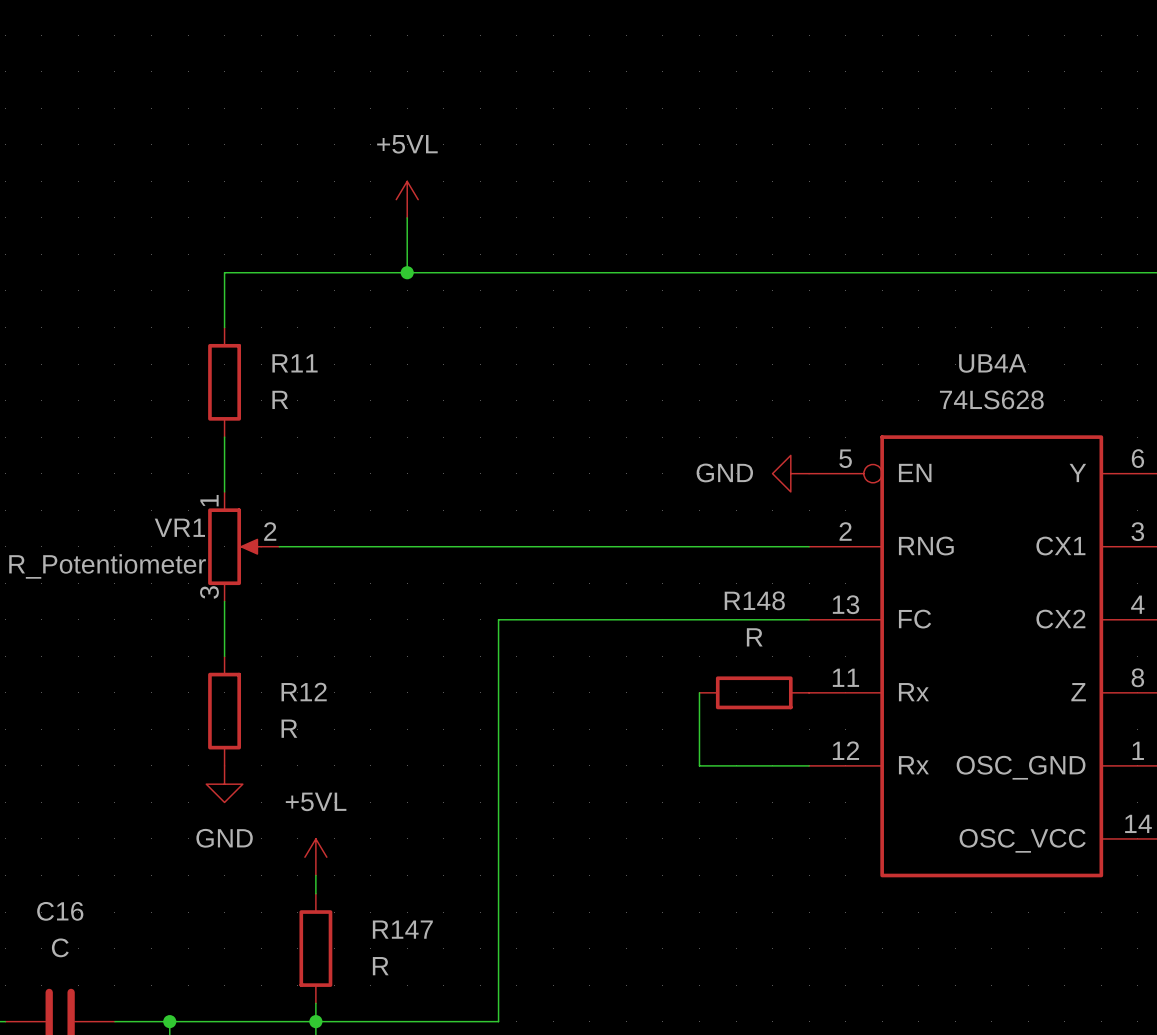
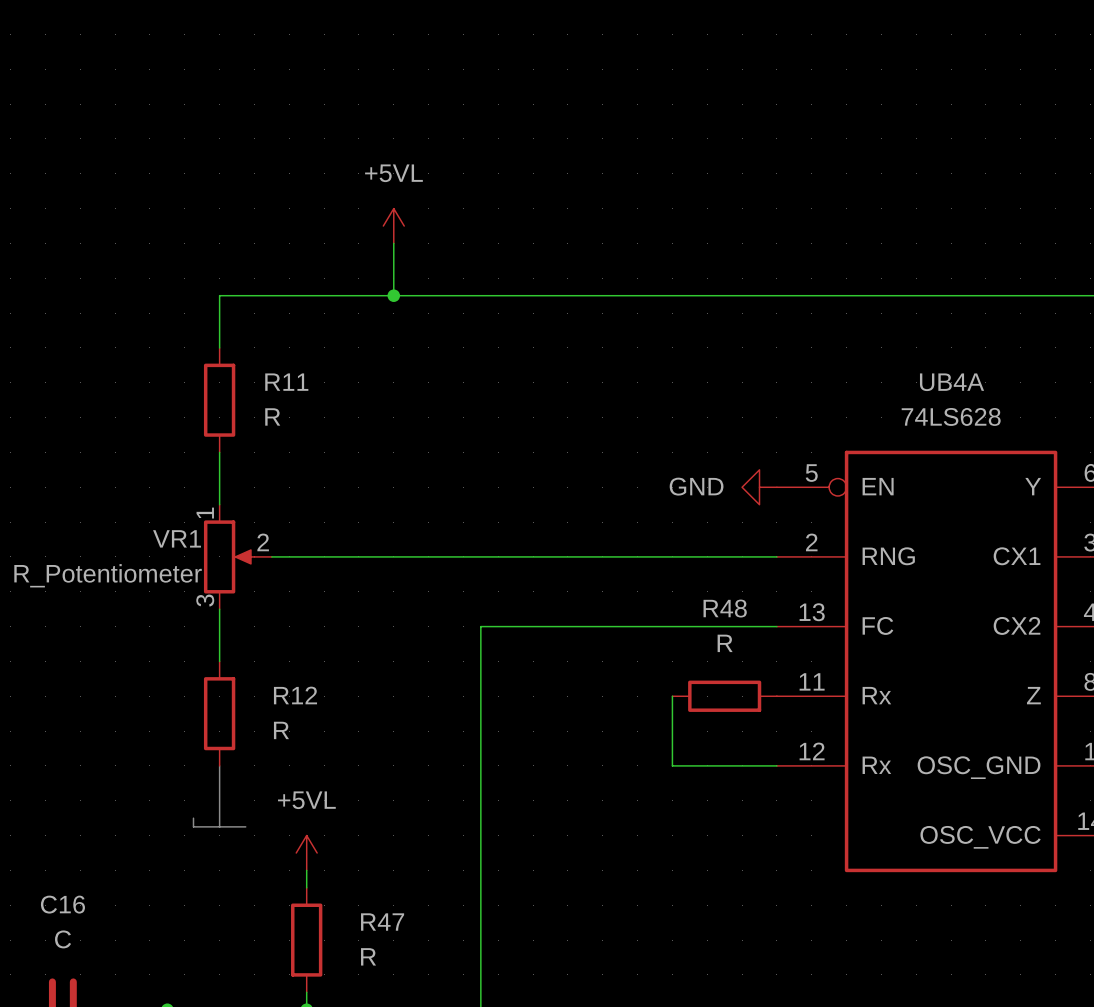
R148 name: R148 (754, 600) -> R48 (725, 608)
line: none -> (219, 765) (219, 826)
power symbol: GND (224, 784) -> none
line: none -> (193, 818) (193, 826) (245, 826)
R147 name: R147 (402, 929) -> R47 (382, 922)

